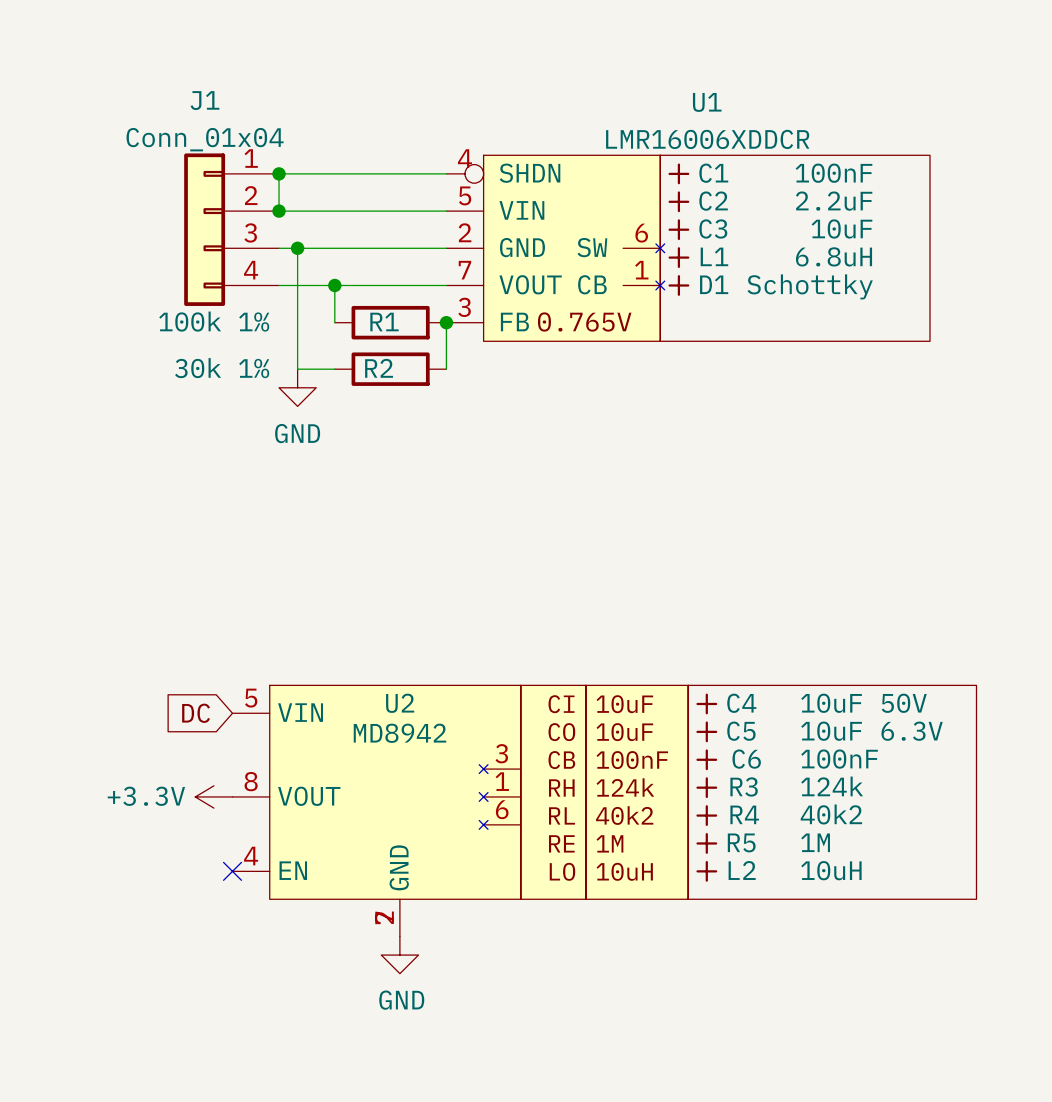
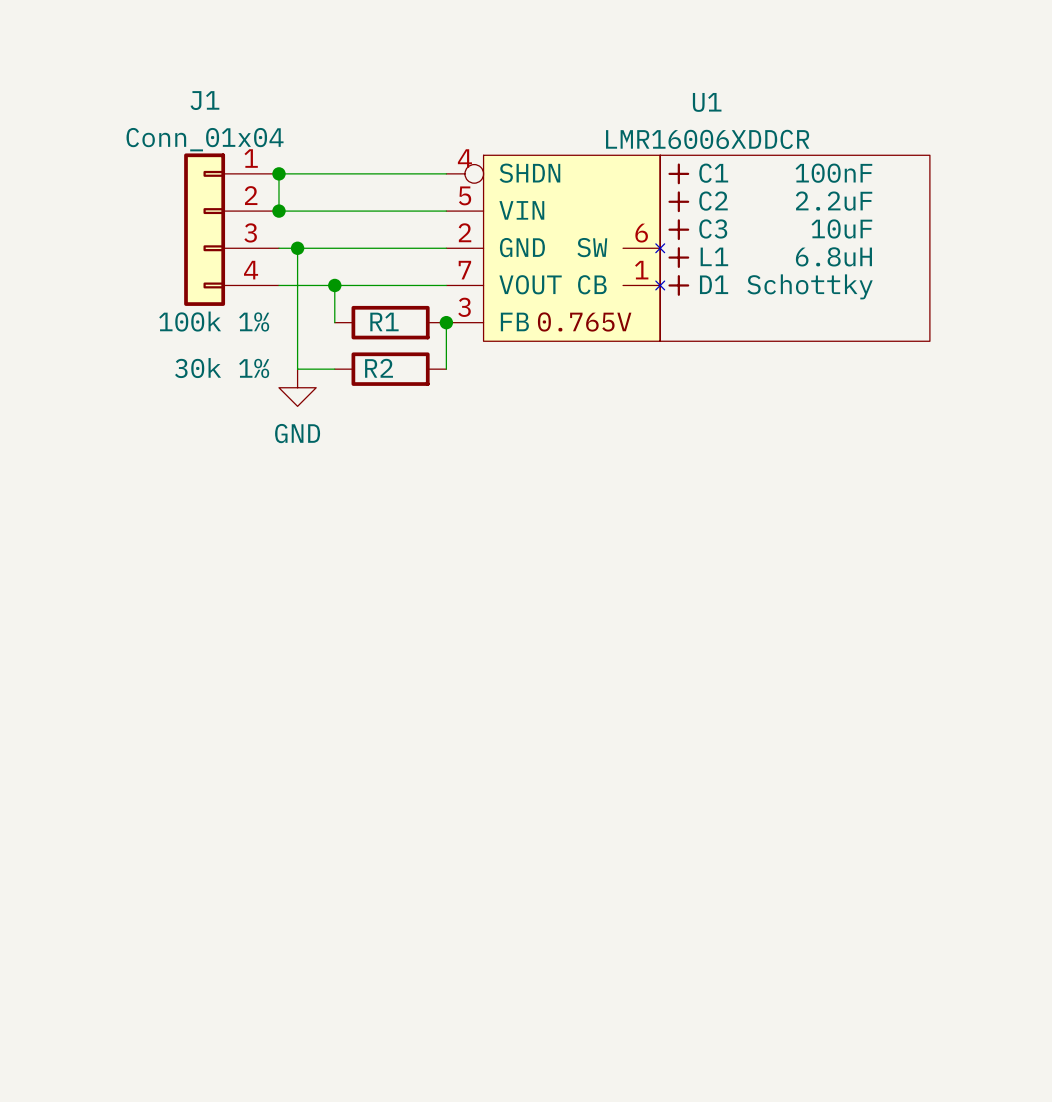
C4: 10uF 50V (706, 703) -> none
global label: DC (196, 713) -> none
C5: 10uF 6.3V (706, 731) -> none
C6: 100nF (706, 759) -> none
R3: 124k (706, 787) -> none
power symbol: +3.3V (213, 796) -> none
U2: MD8942 (604, 810) -> none
R4: 40k2 (706, 815) -> none
R5: 1M (706, 843) -> none
no-connect mark: (232, 871) -> none
L2: 10uH (706, 871) -> none
power symbol: GND (399, 955) -> none

